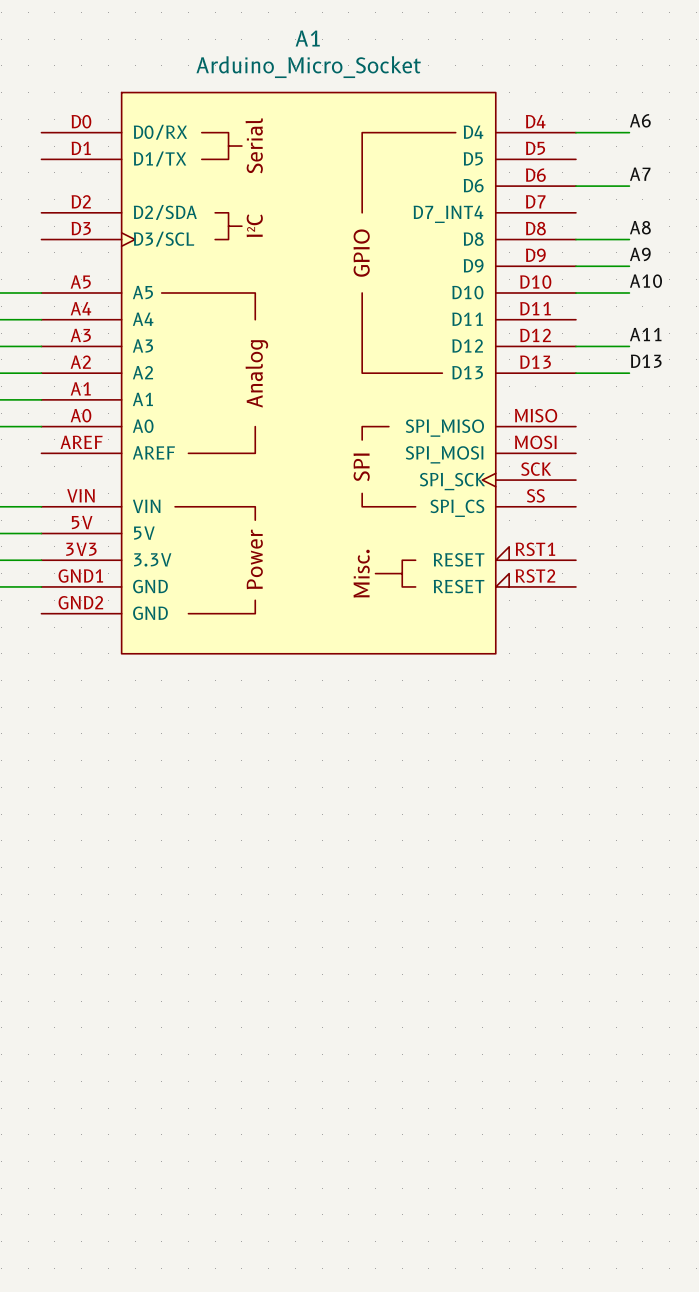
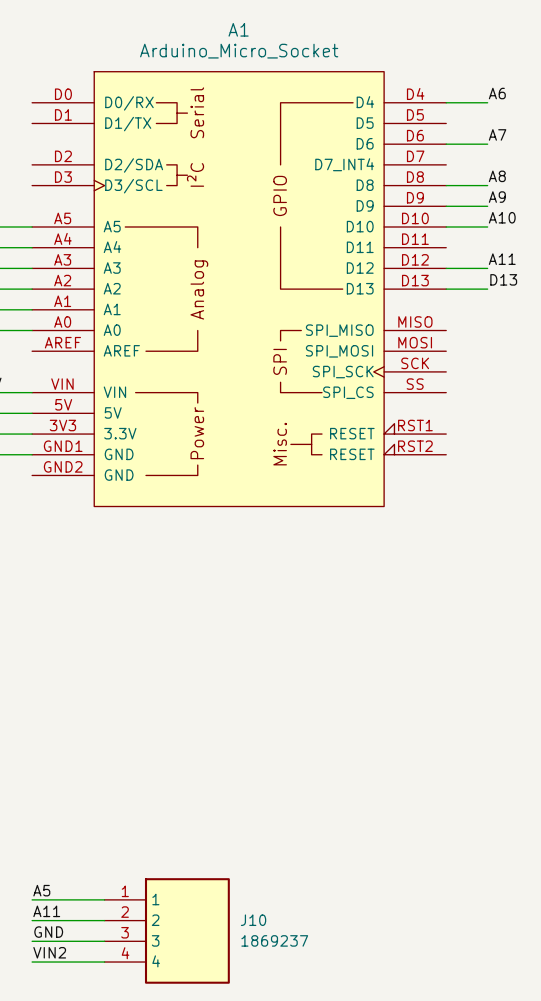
label: none -> A5 (41, 890)
wire: none -> (32, 899) (104, 899)
label: none -> A11 (46, 911)
wire: none -> (32, 920) (104, 920)
J10: none -> 1869237 (167, 930)
label: none -> GND (48, 932)
wire: none -> (32, 941) (104, 941)
label: none -> VIN2 (49, 952)
wire: none -> (32, 962) (104, 962)

